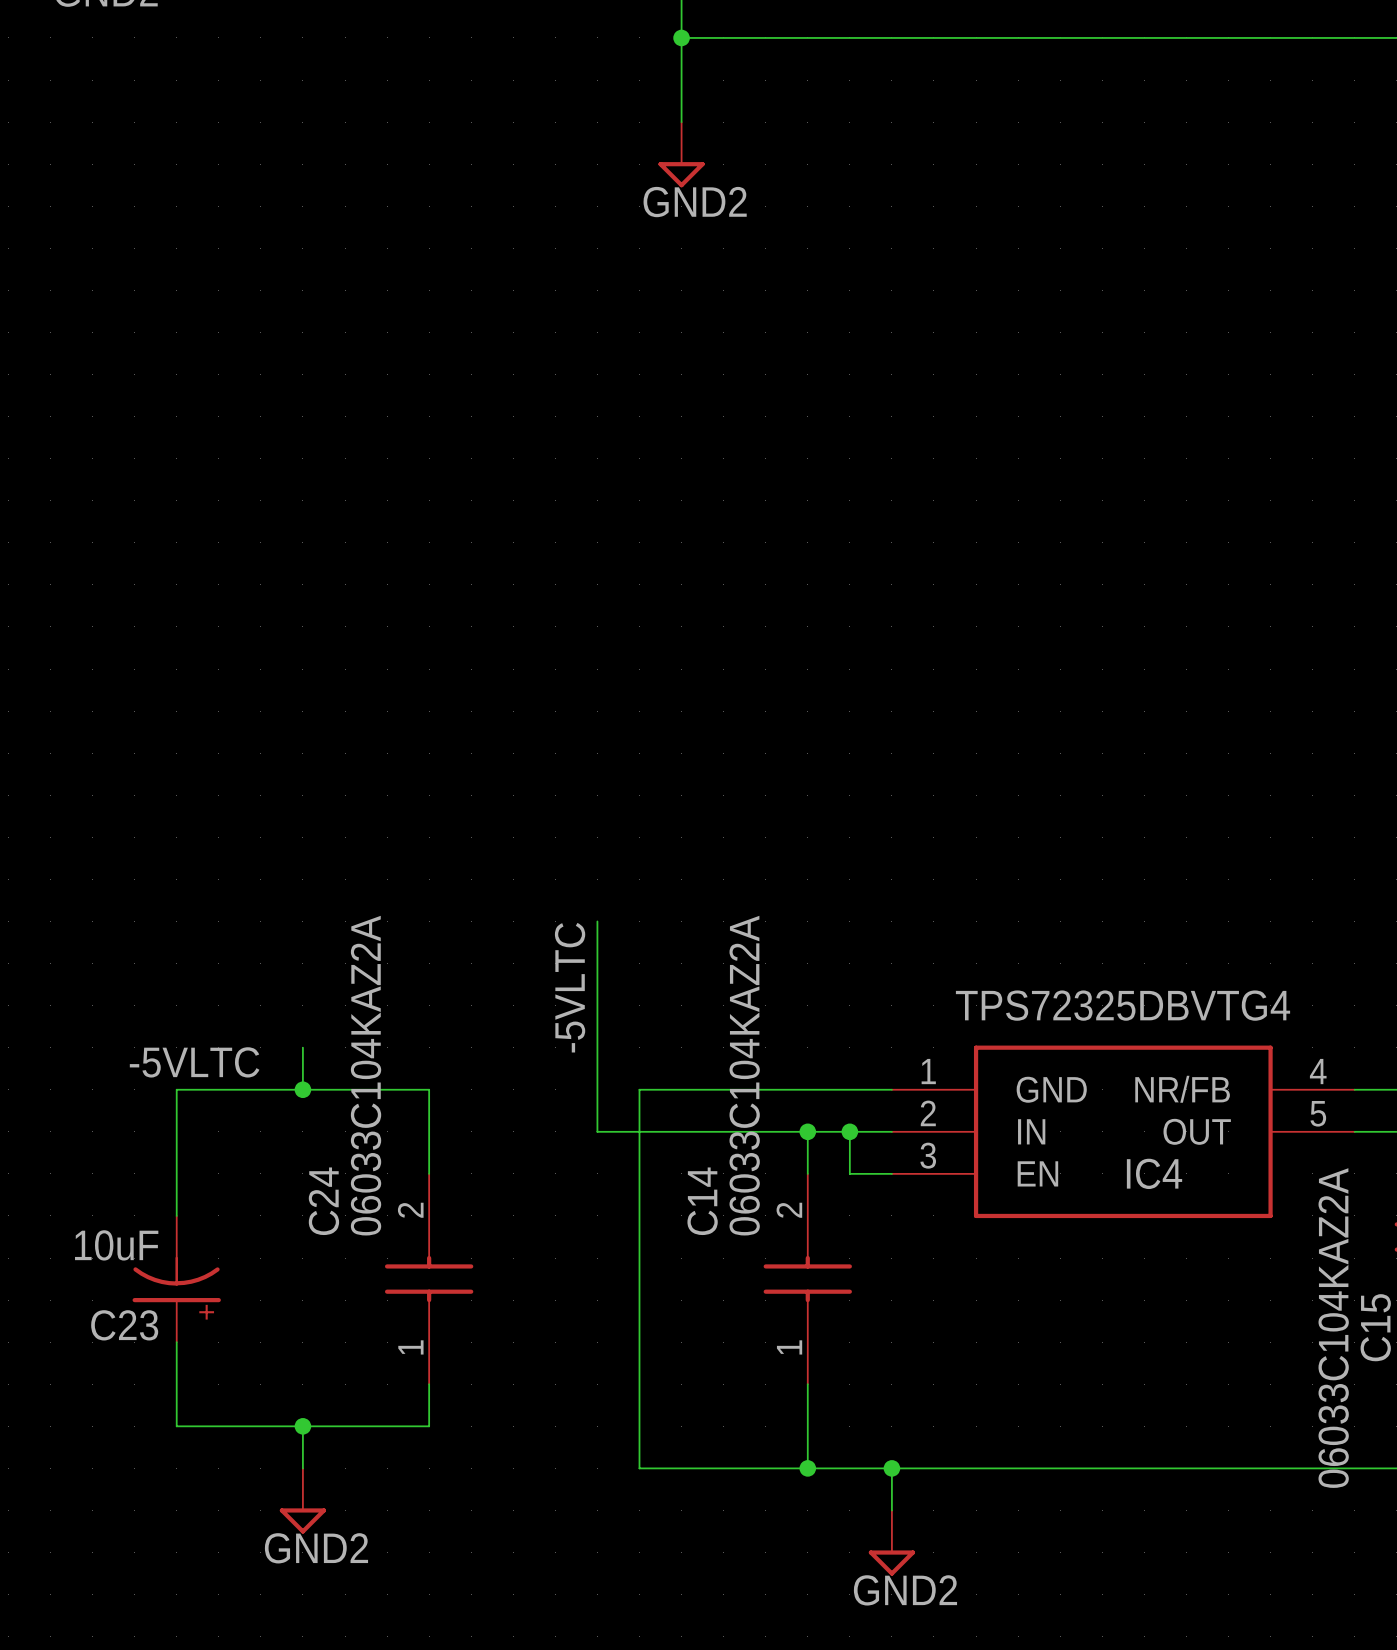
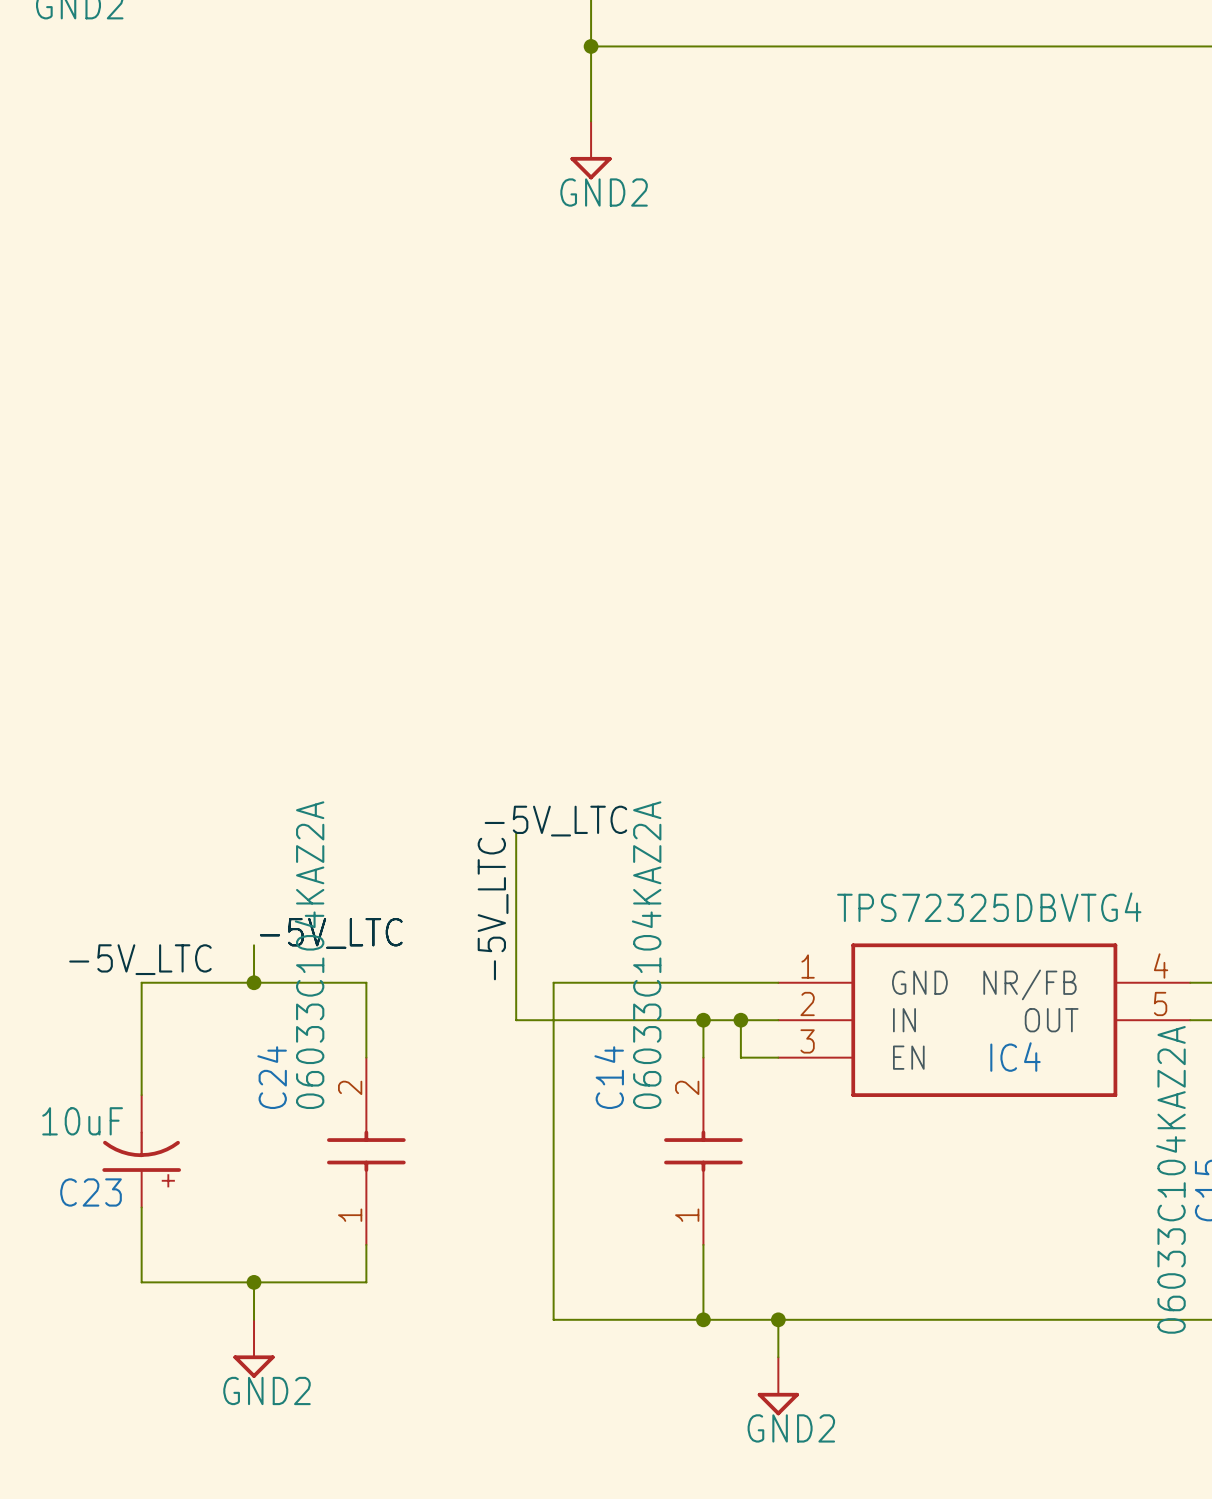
label: none -> -5V_LTC (555, 821)
label: -5VLTC (570, 987) -> -5V_LTC (493, 909)
label: none -> -5V_LTC (331, 933)
label: -5VLTC (194, 1062) -> -5V_LTC (140, 959)

